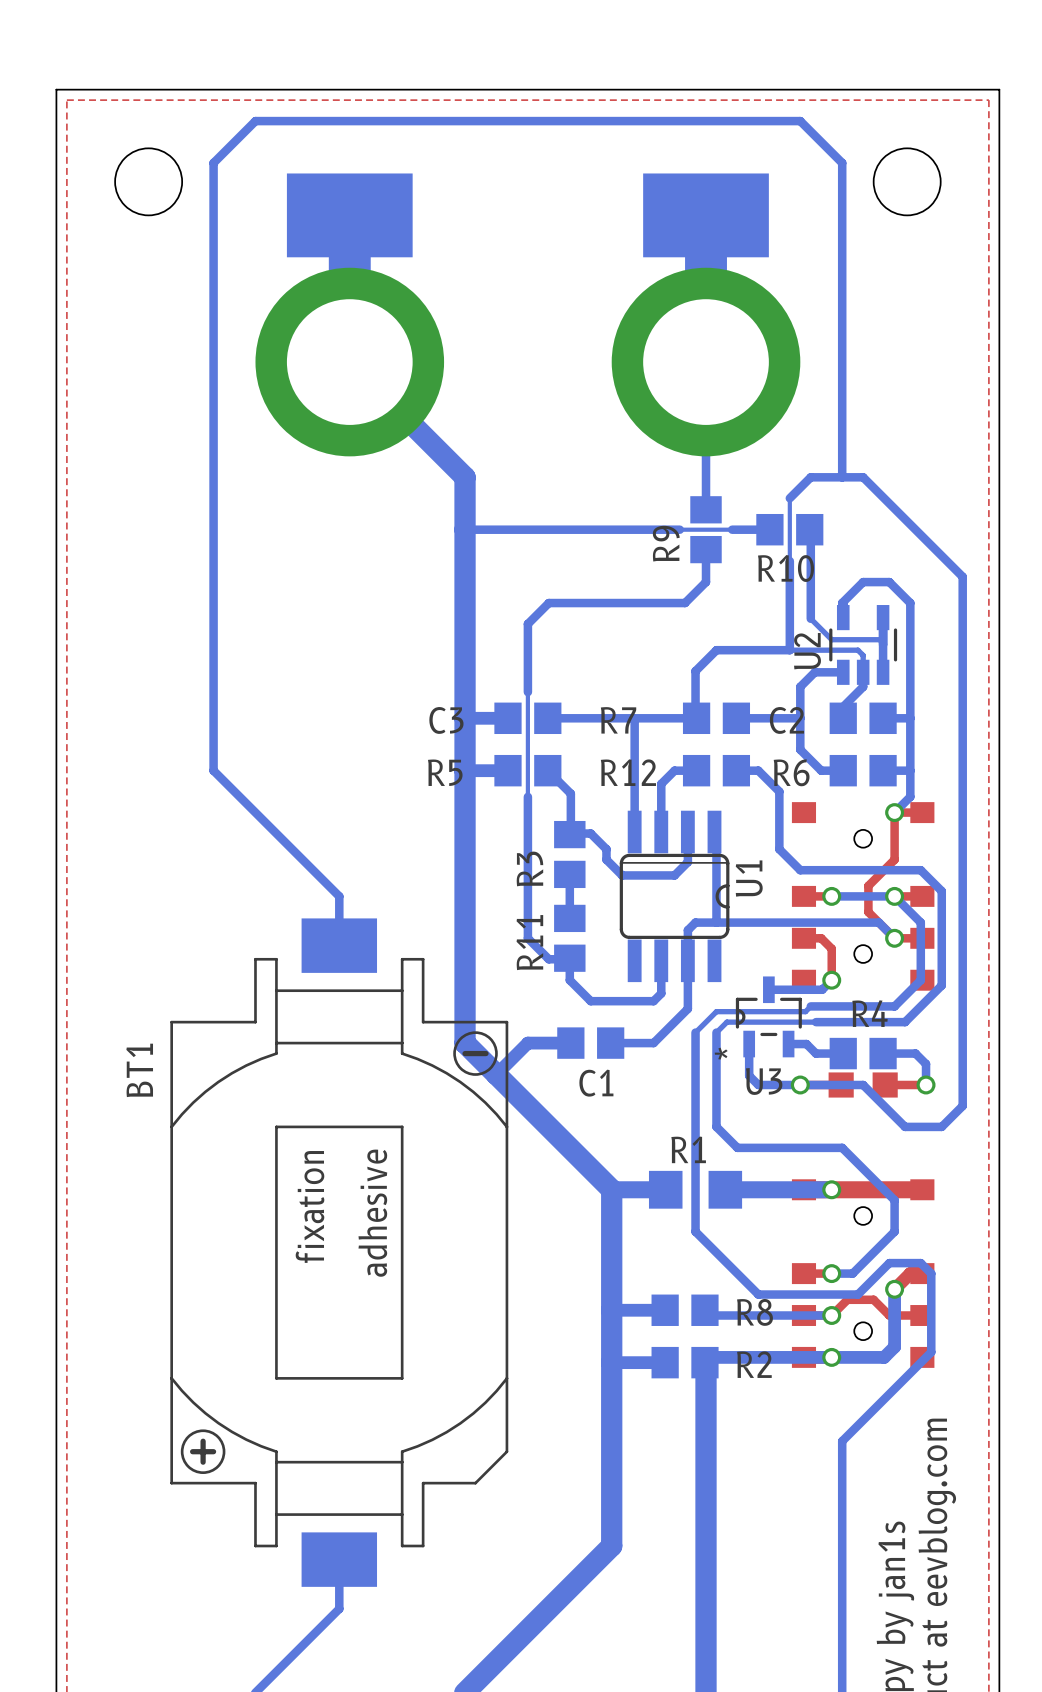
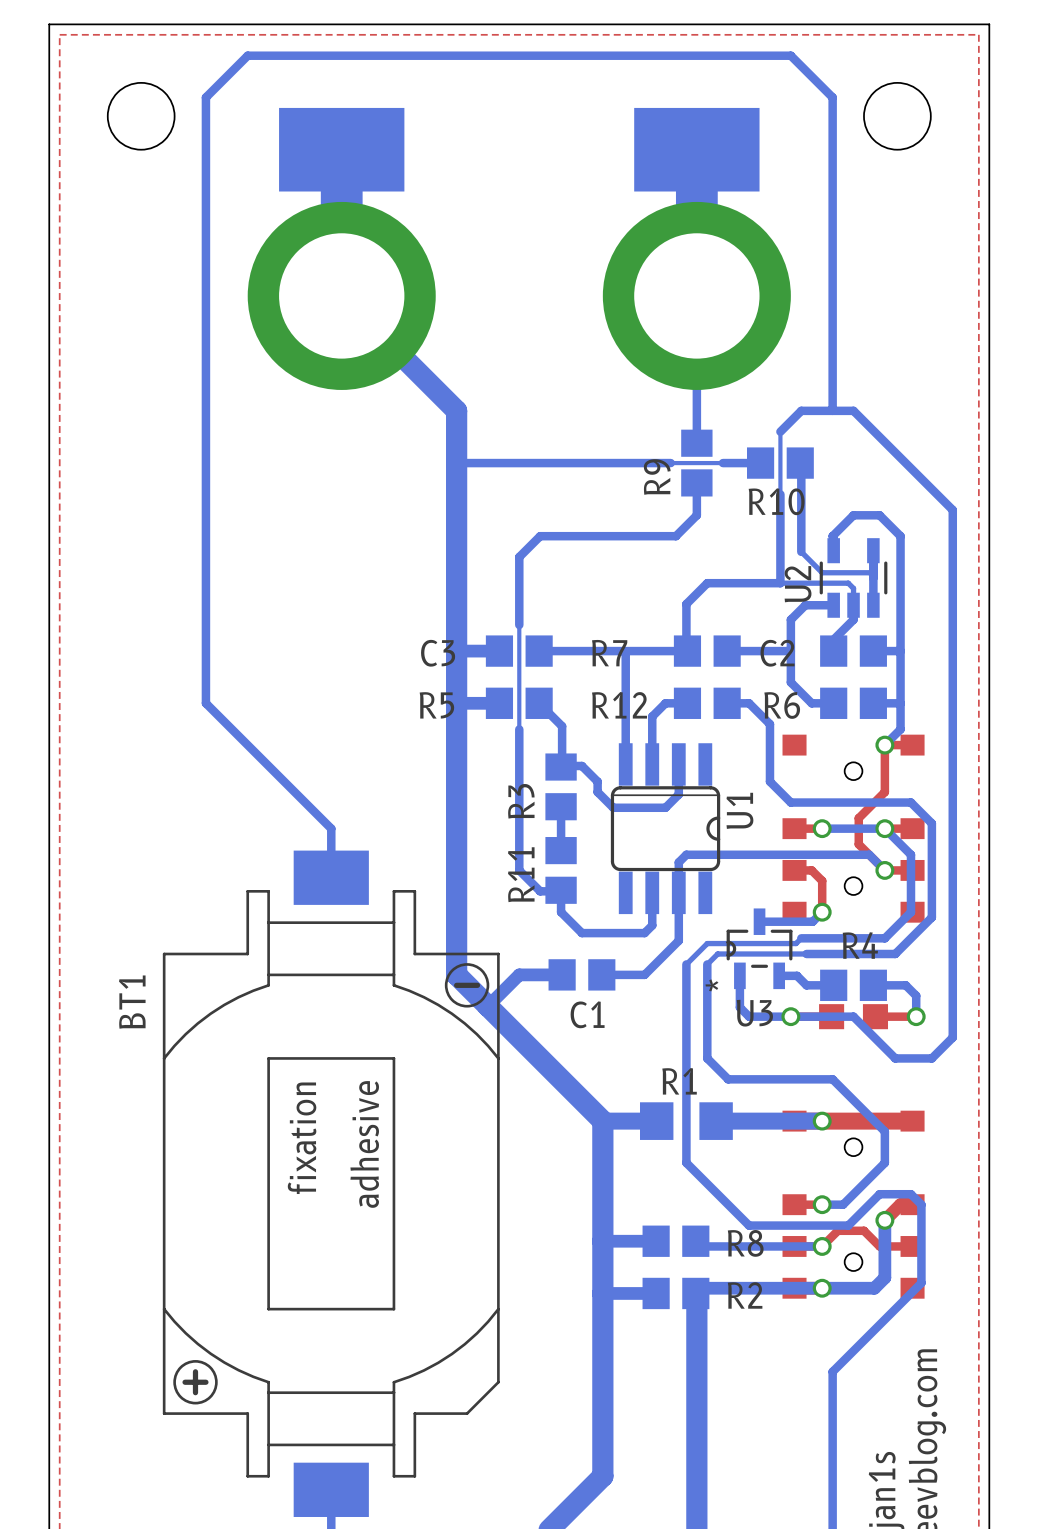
bottom track: (714, 832) (716, 832) (716, 922) -> none

